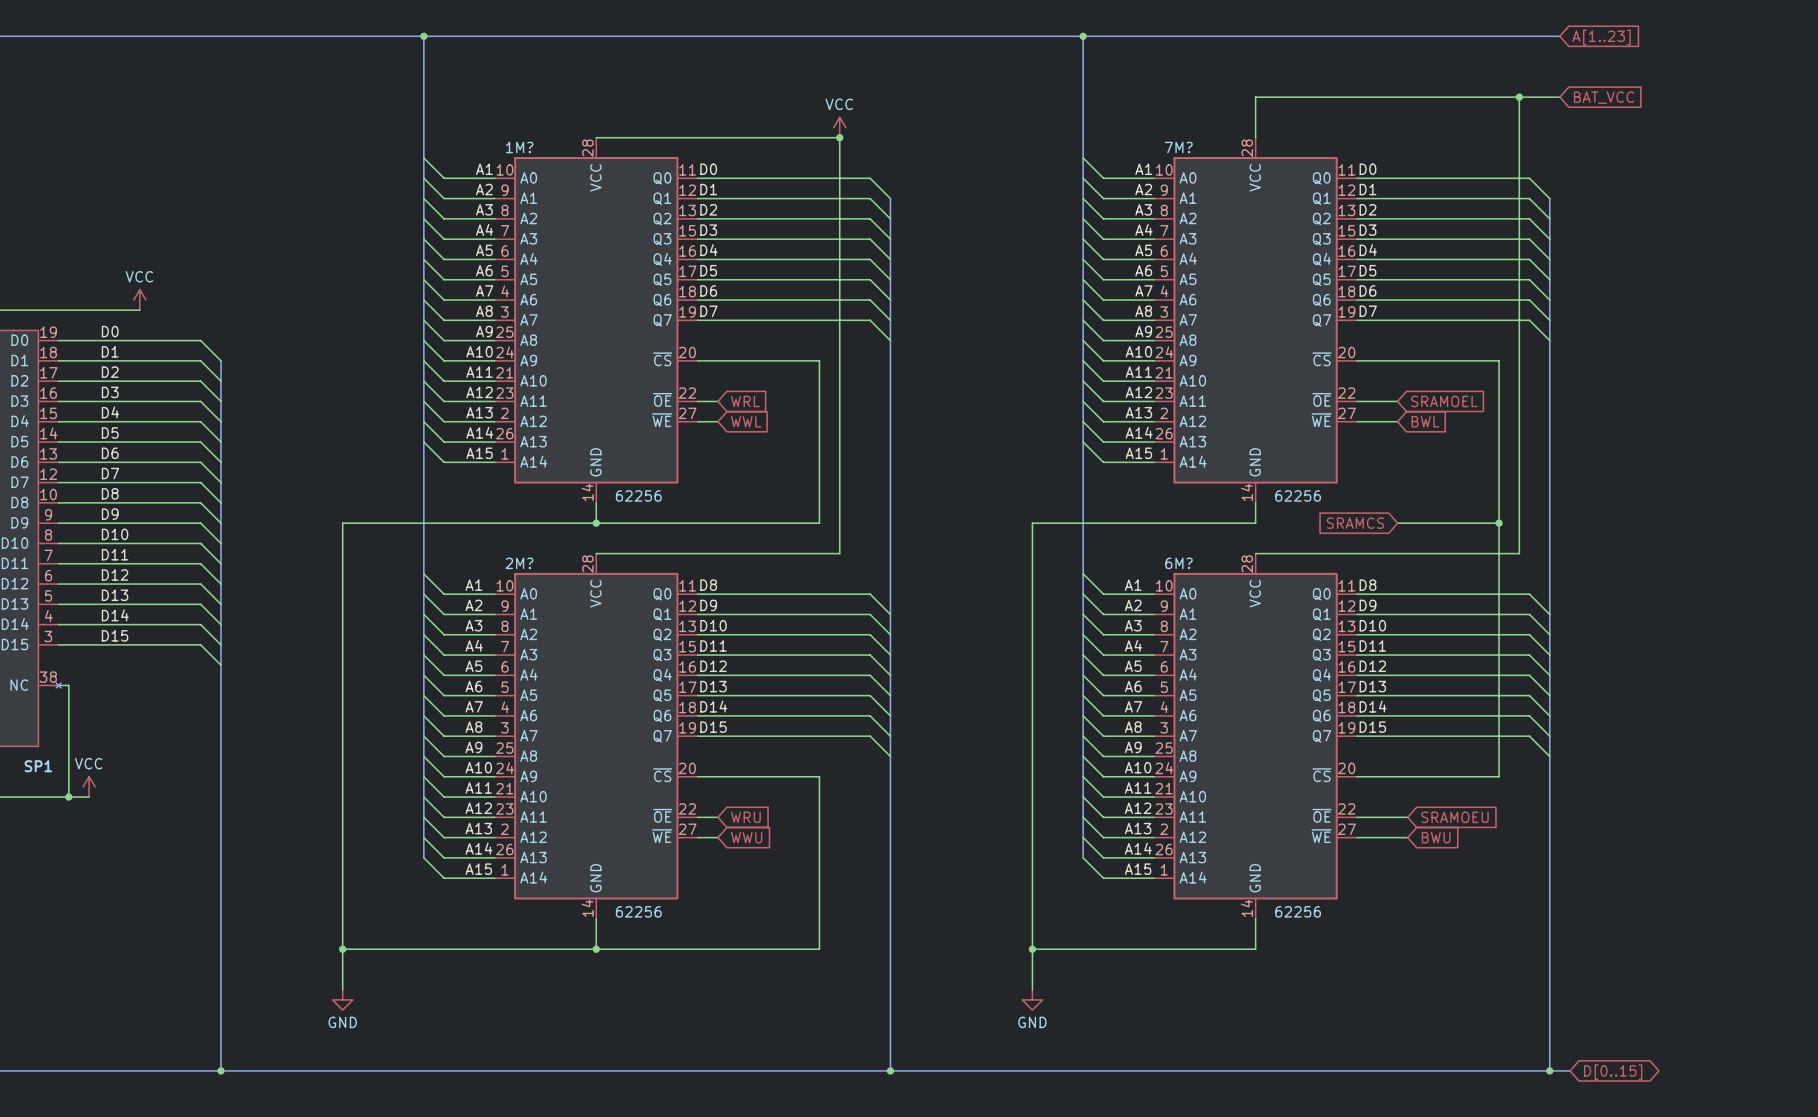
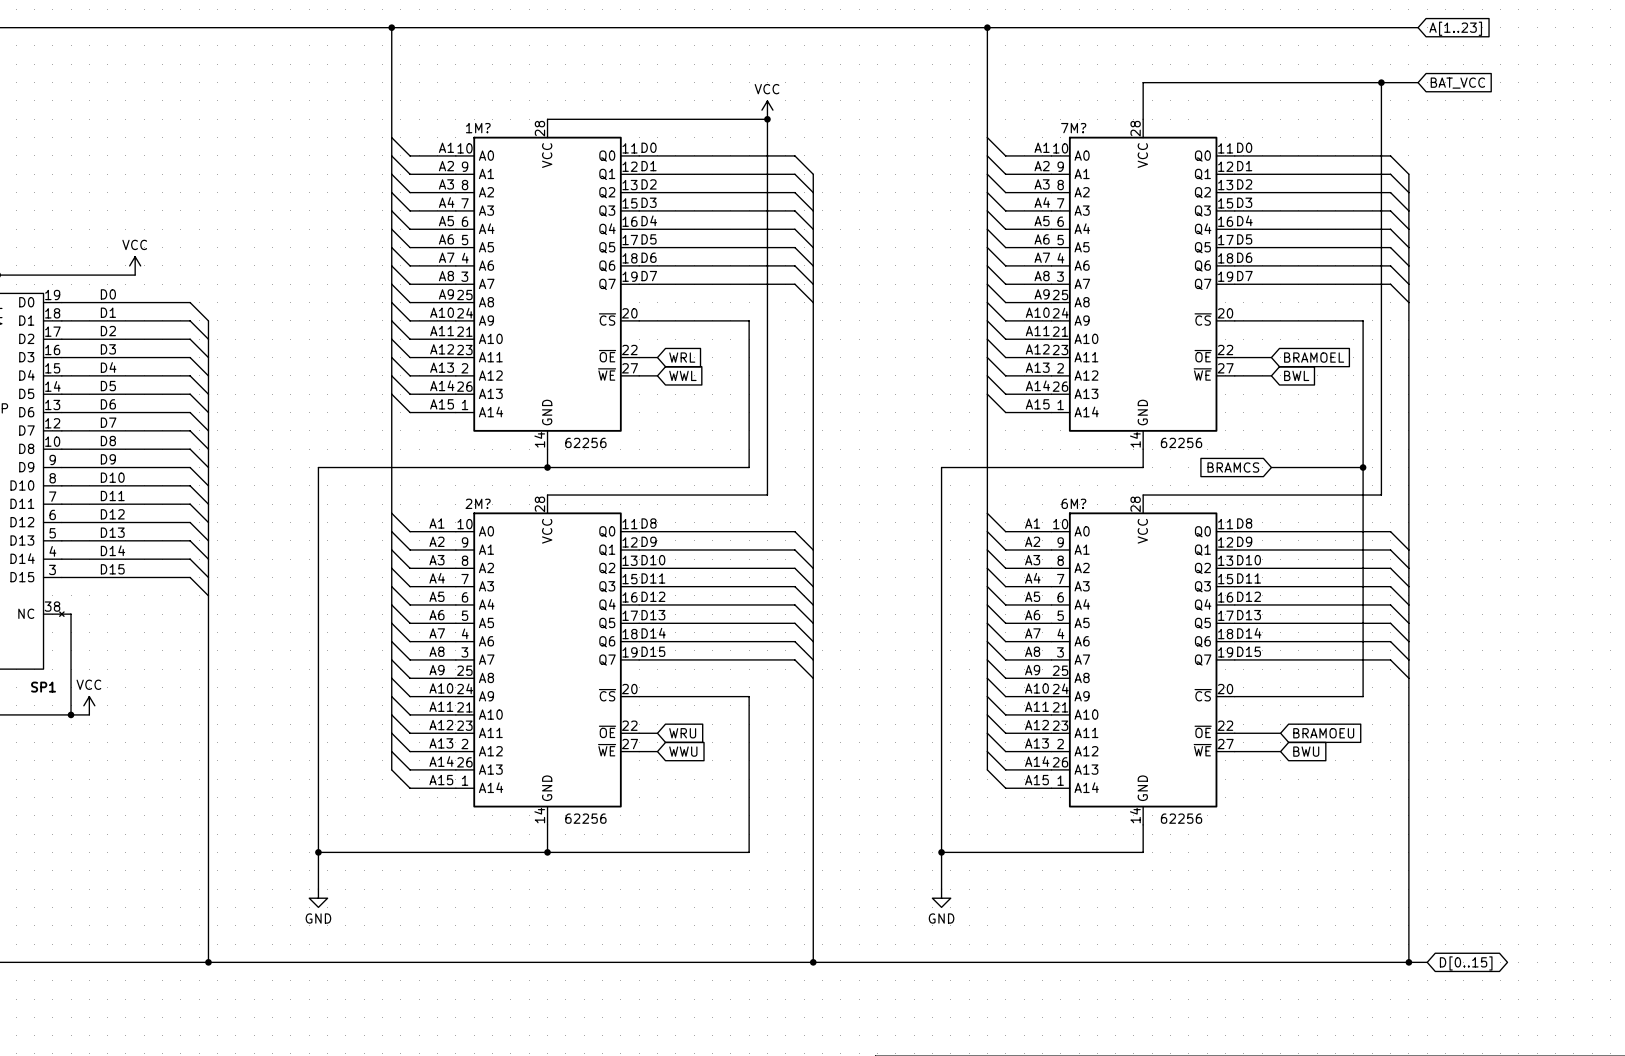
global label: SRAMOEL (1444, 401) -> BRAMOEL (1314, 357)
global label: SRAMCS (1355, 523) -> BRAMCS (1233, 467)
global label: SRAMOEU (1454, 817) -> BRAMOEU (1323, 733)

